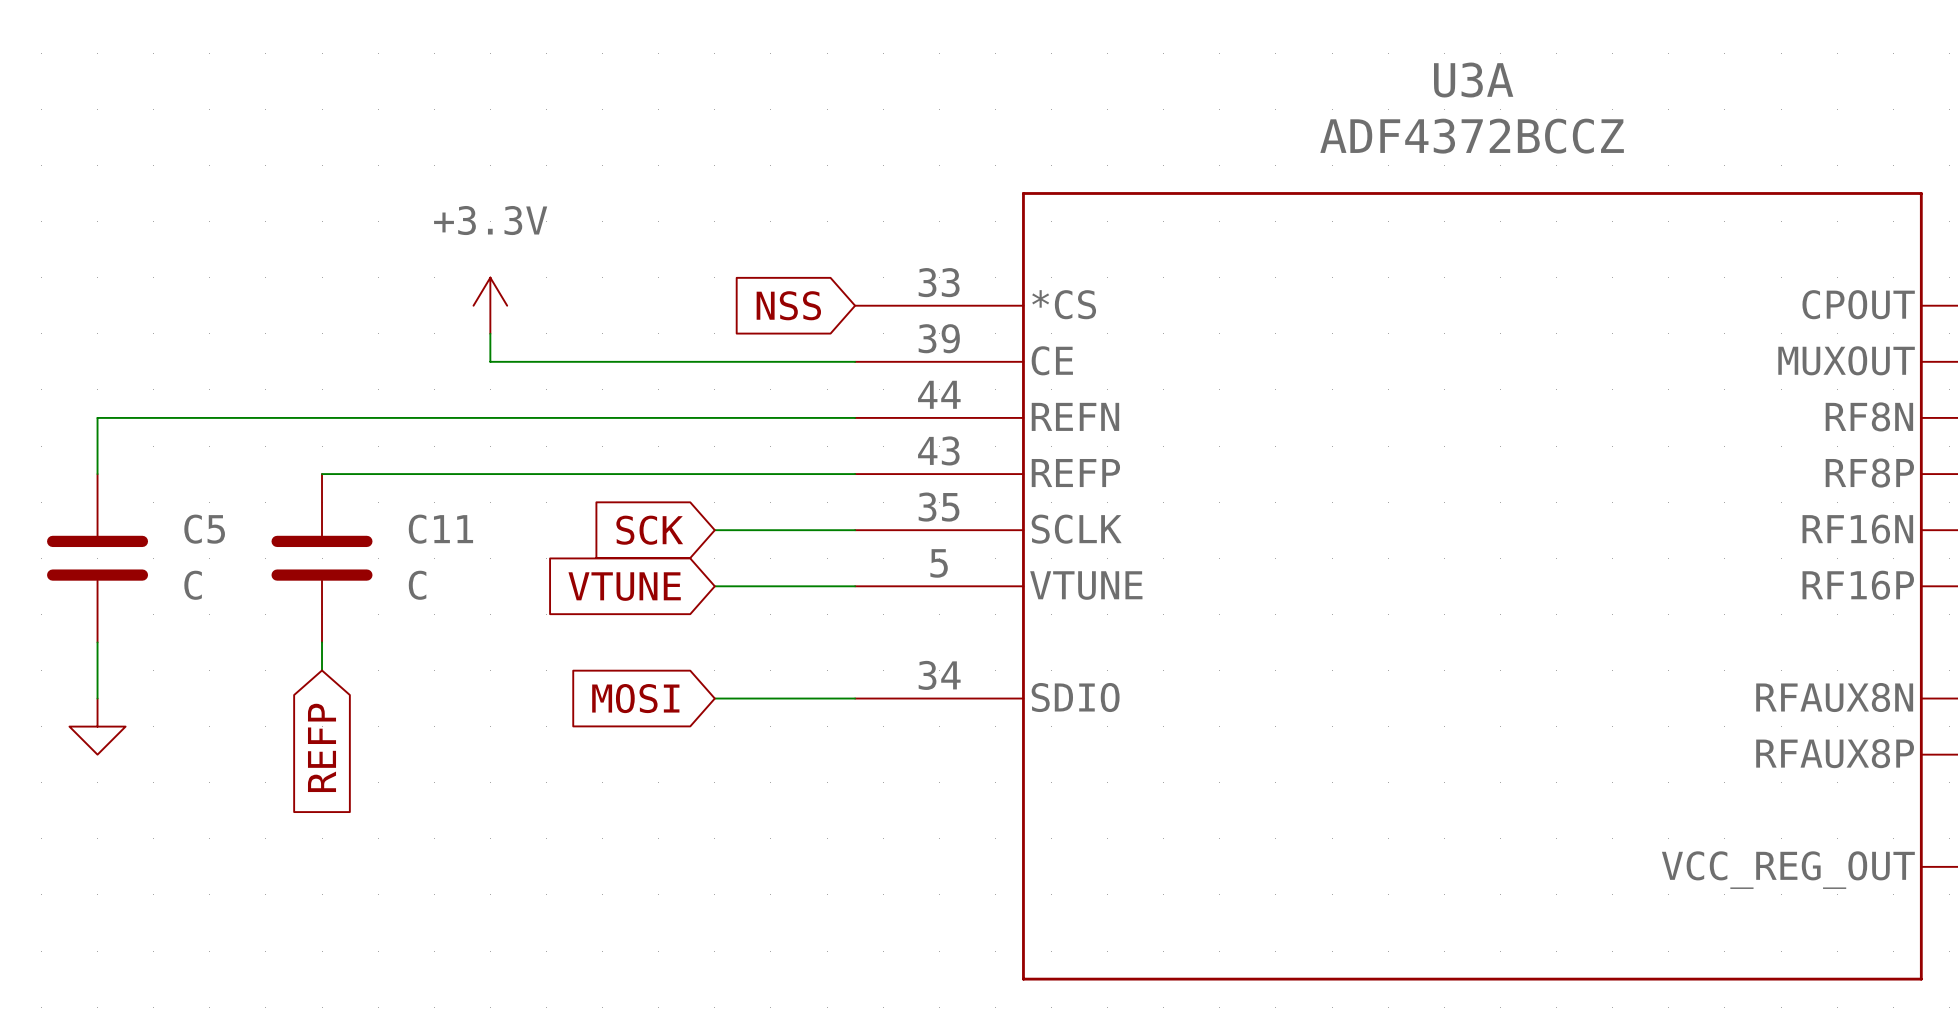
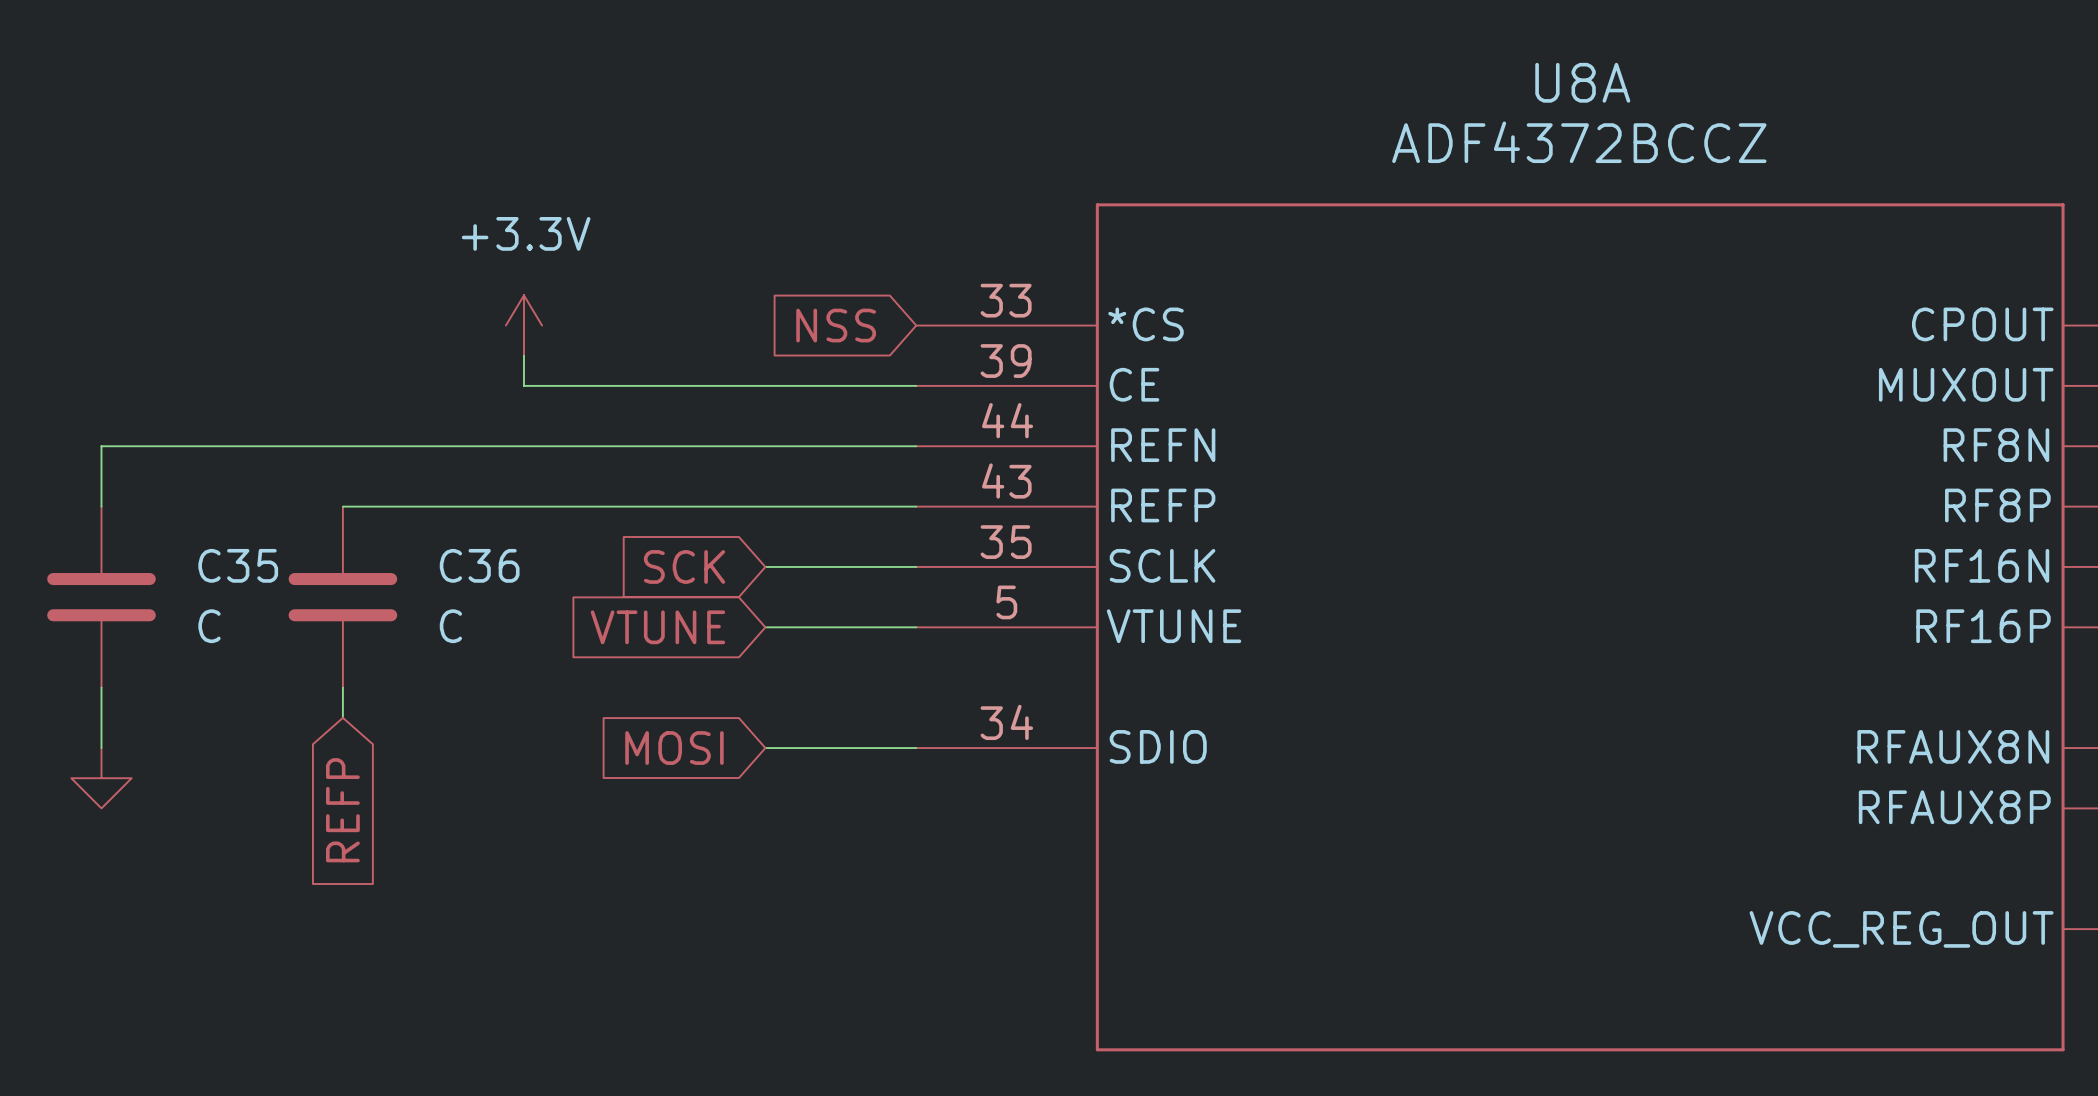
U3A name: U3A (1473, 80) -> U8A (1582, 82)
C5 name: C5 (204, 529) -> C35 (238, 565)
C11 name: C11 (440, 529) -> C36 (479, 565)

